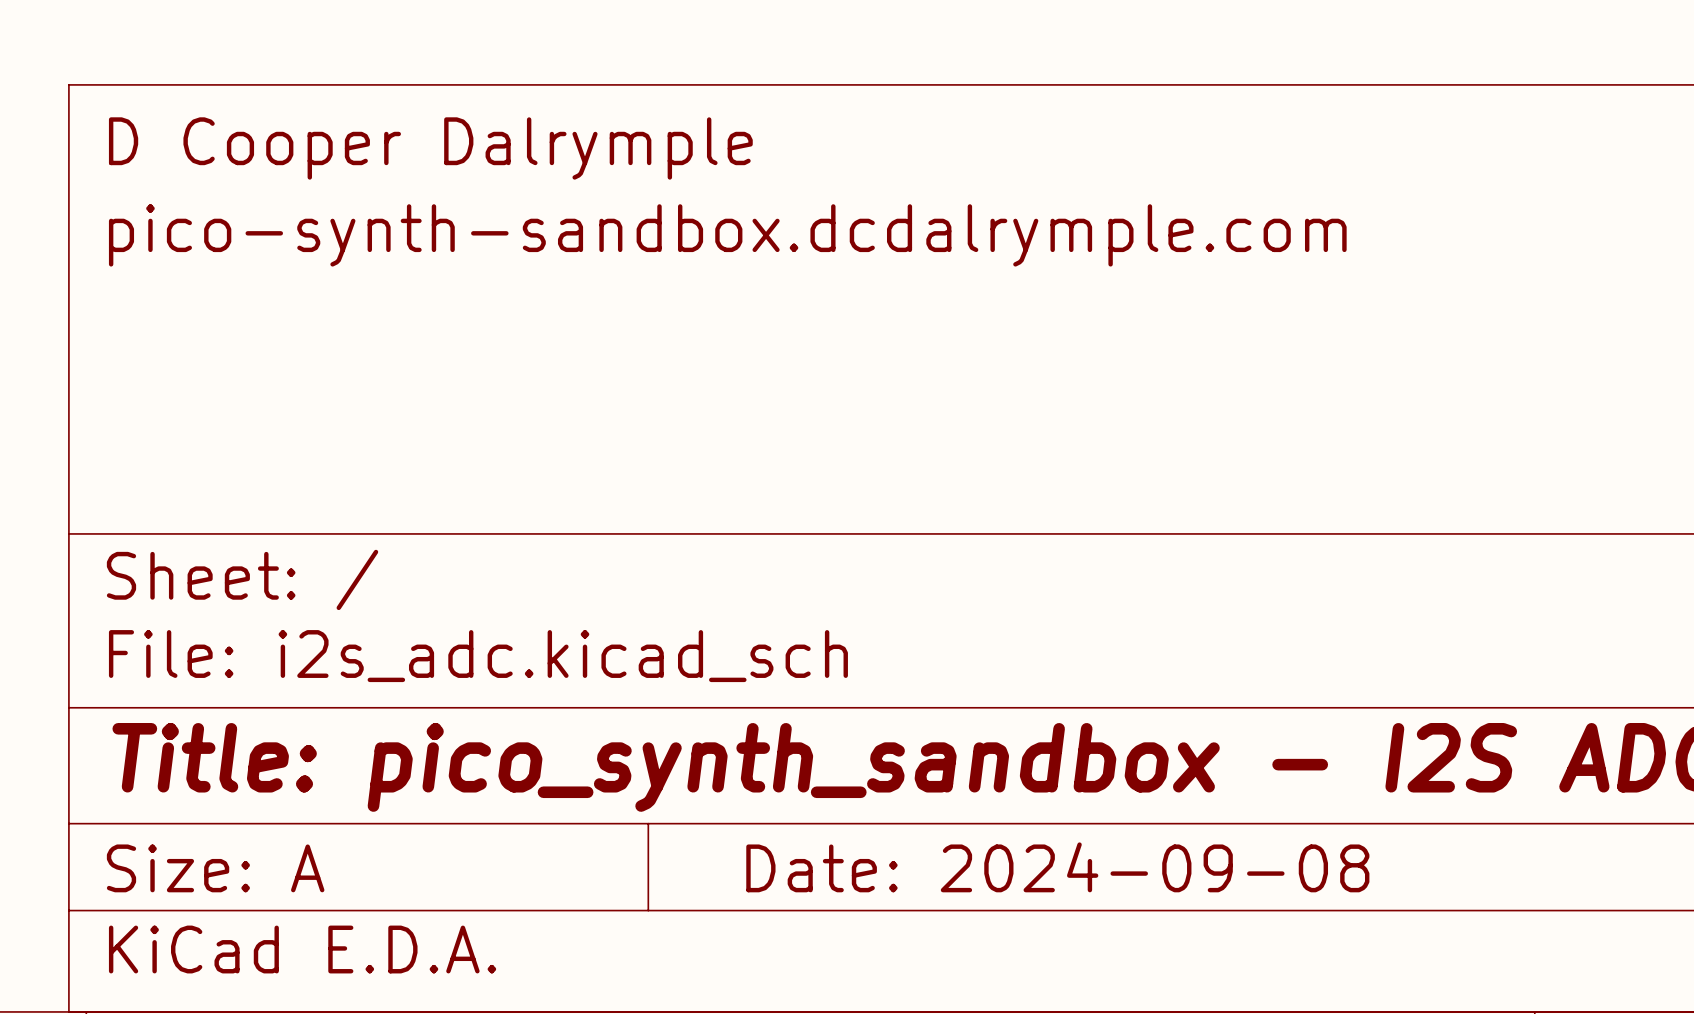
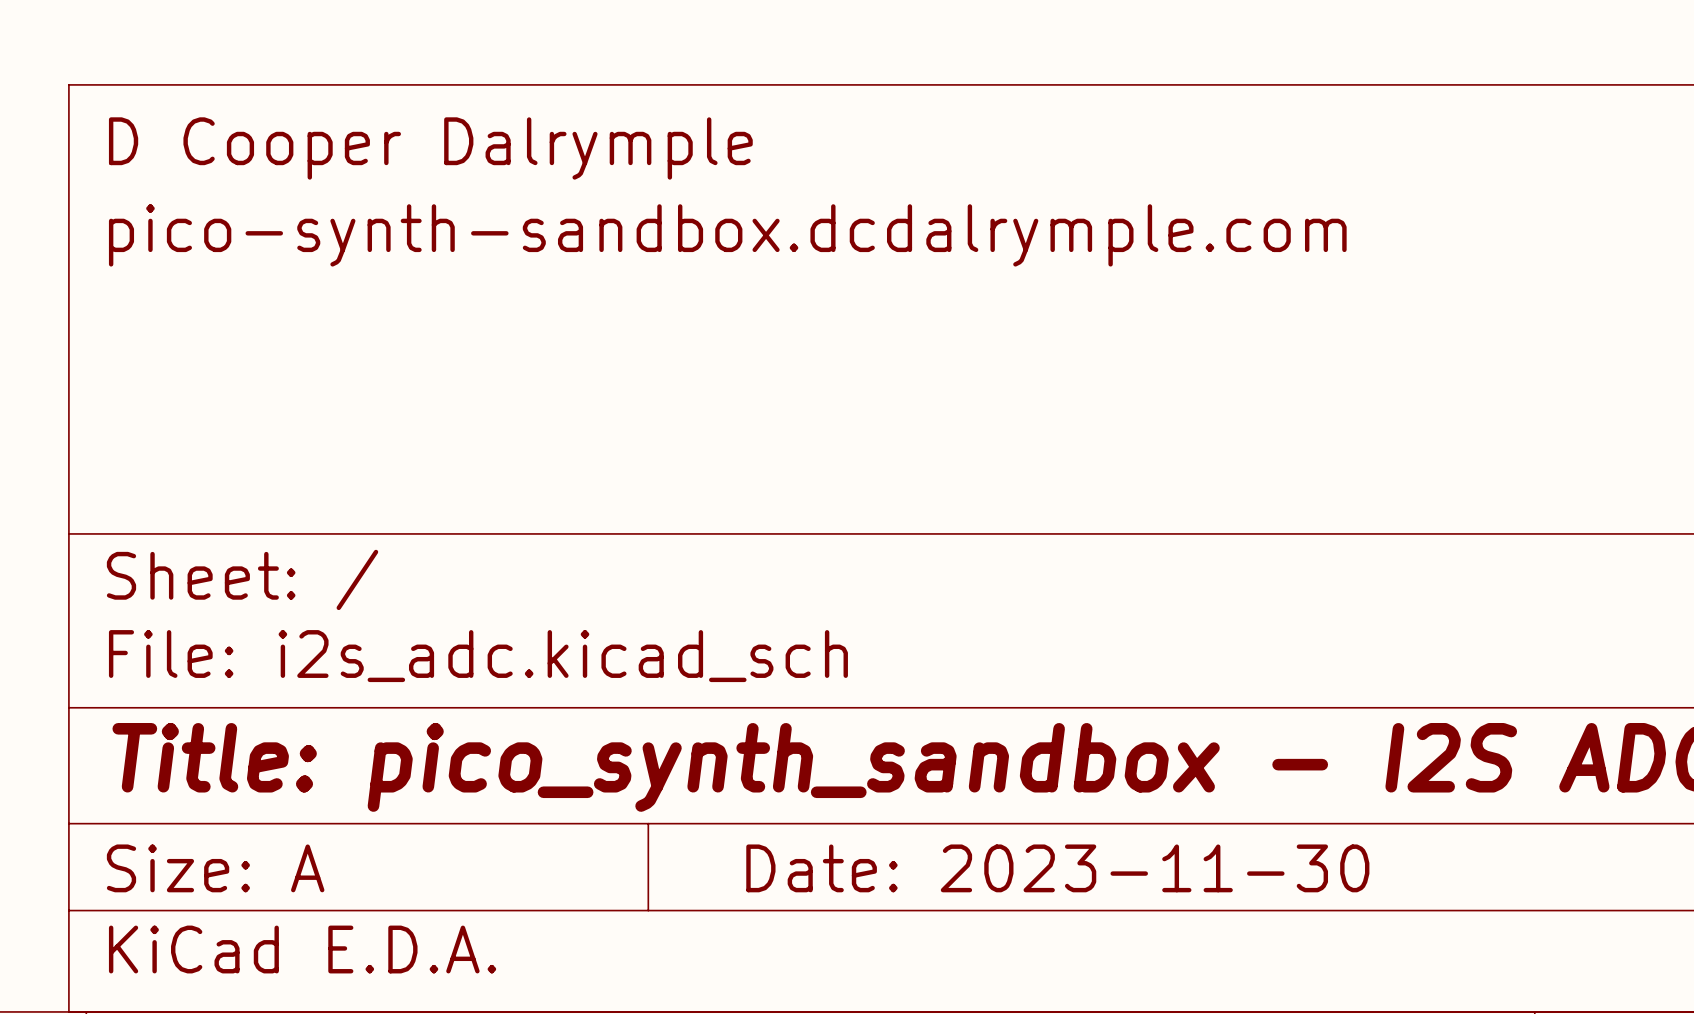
title block: Date: 2024-09-08 (1057, 867) -> Date: 2023-11-30 (1057, 868)

